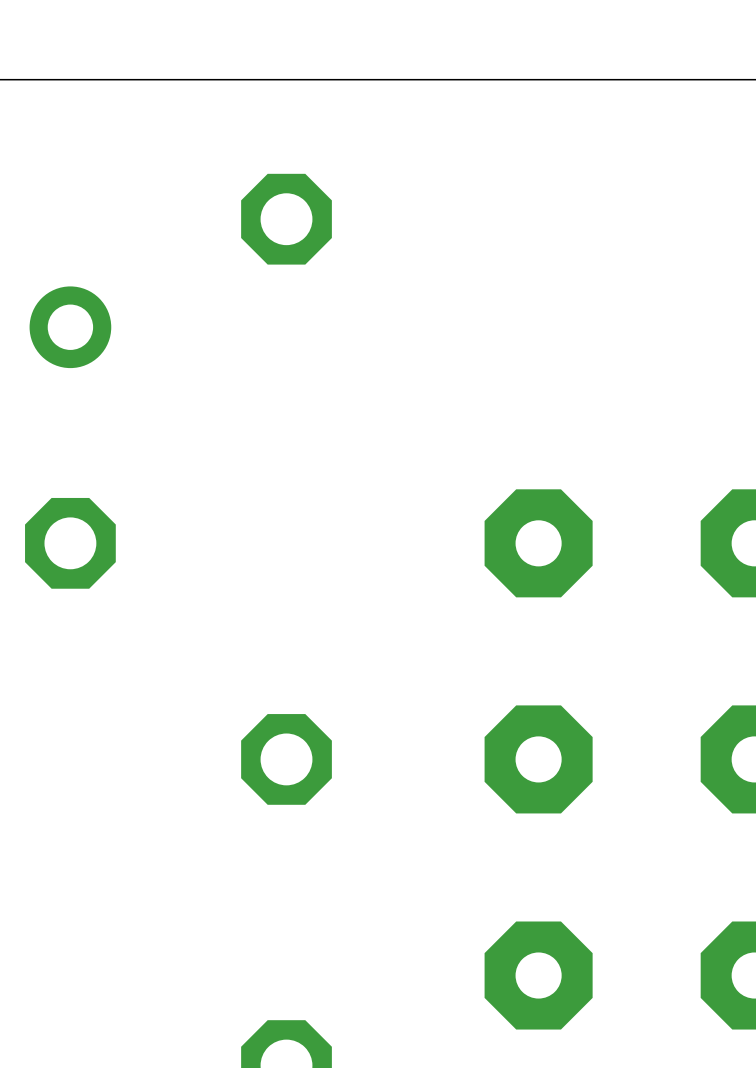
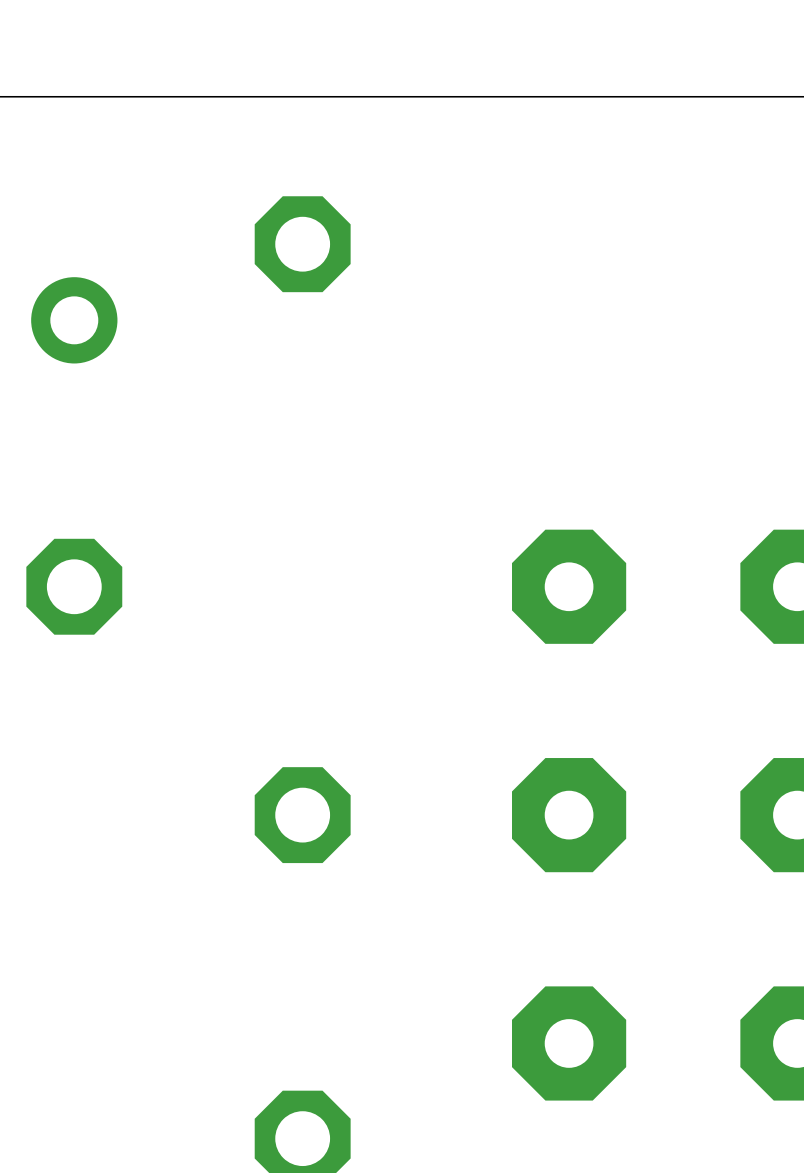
via position: (70, 327) -> (74, 320)

